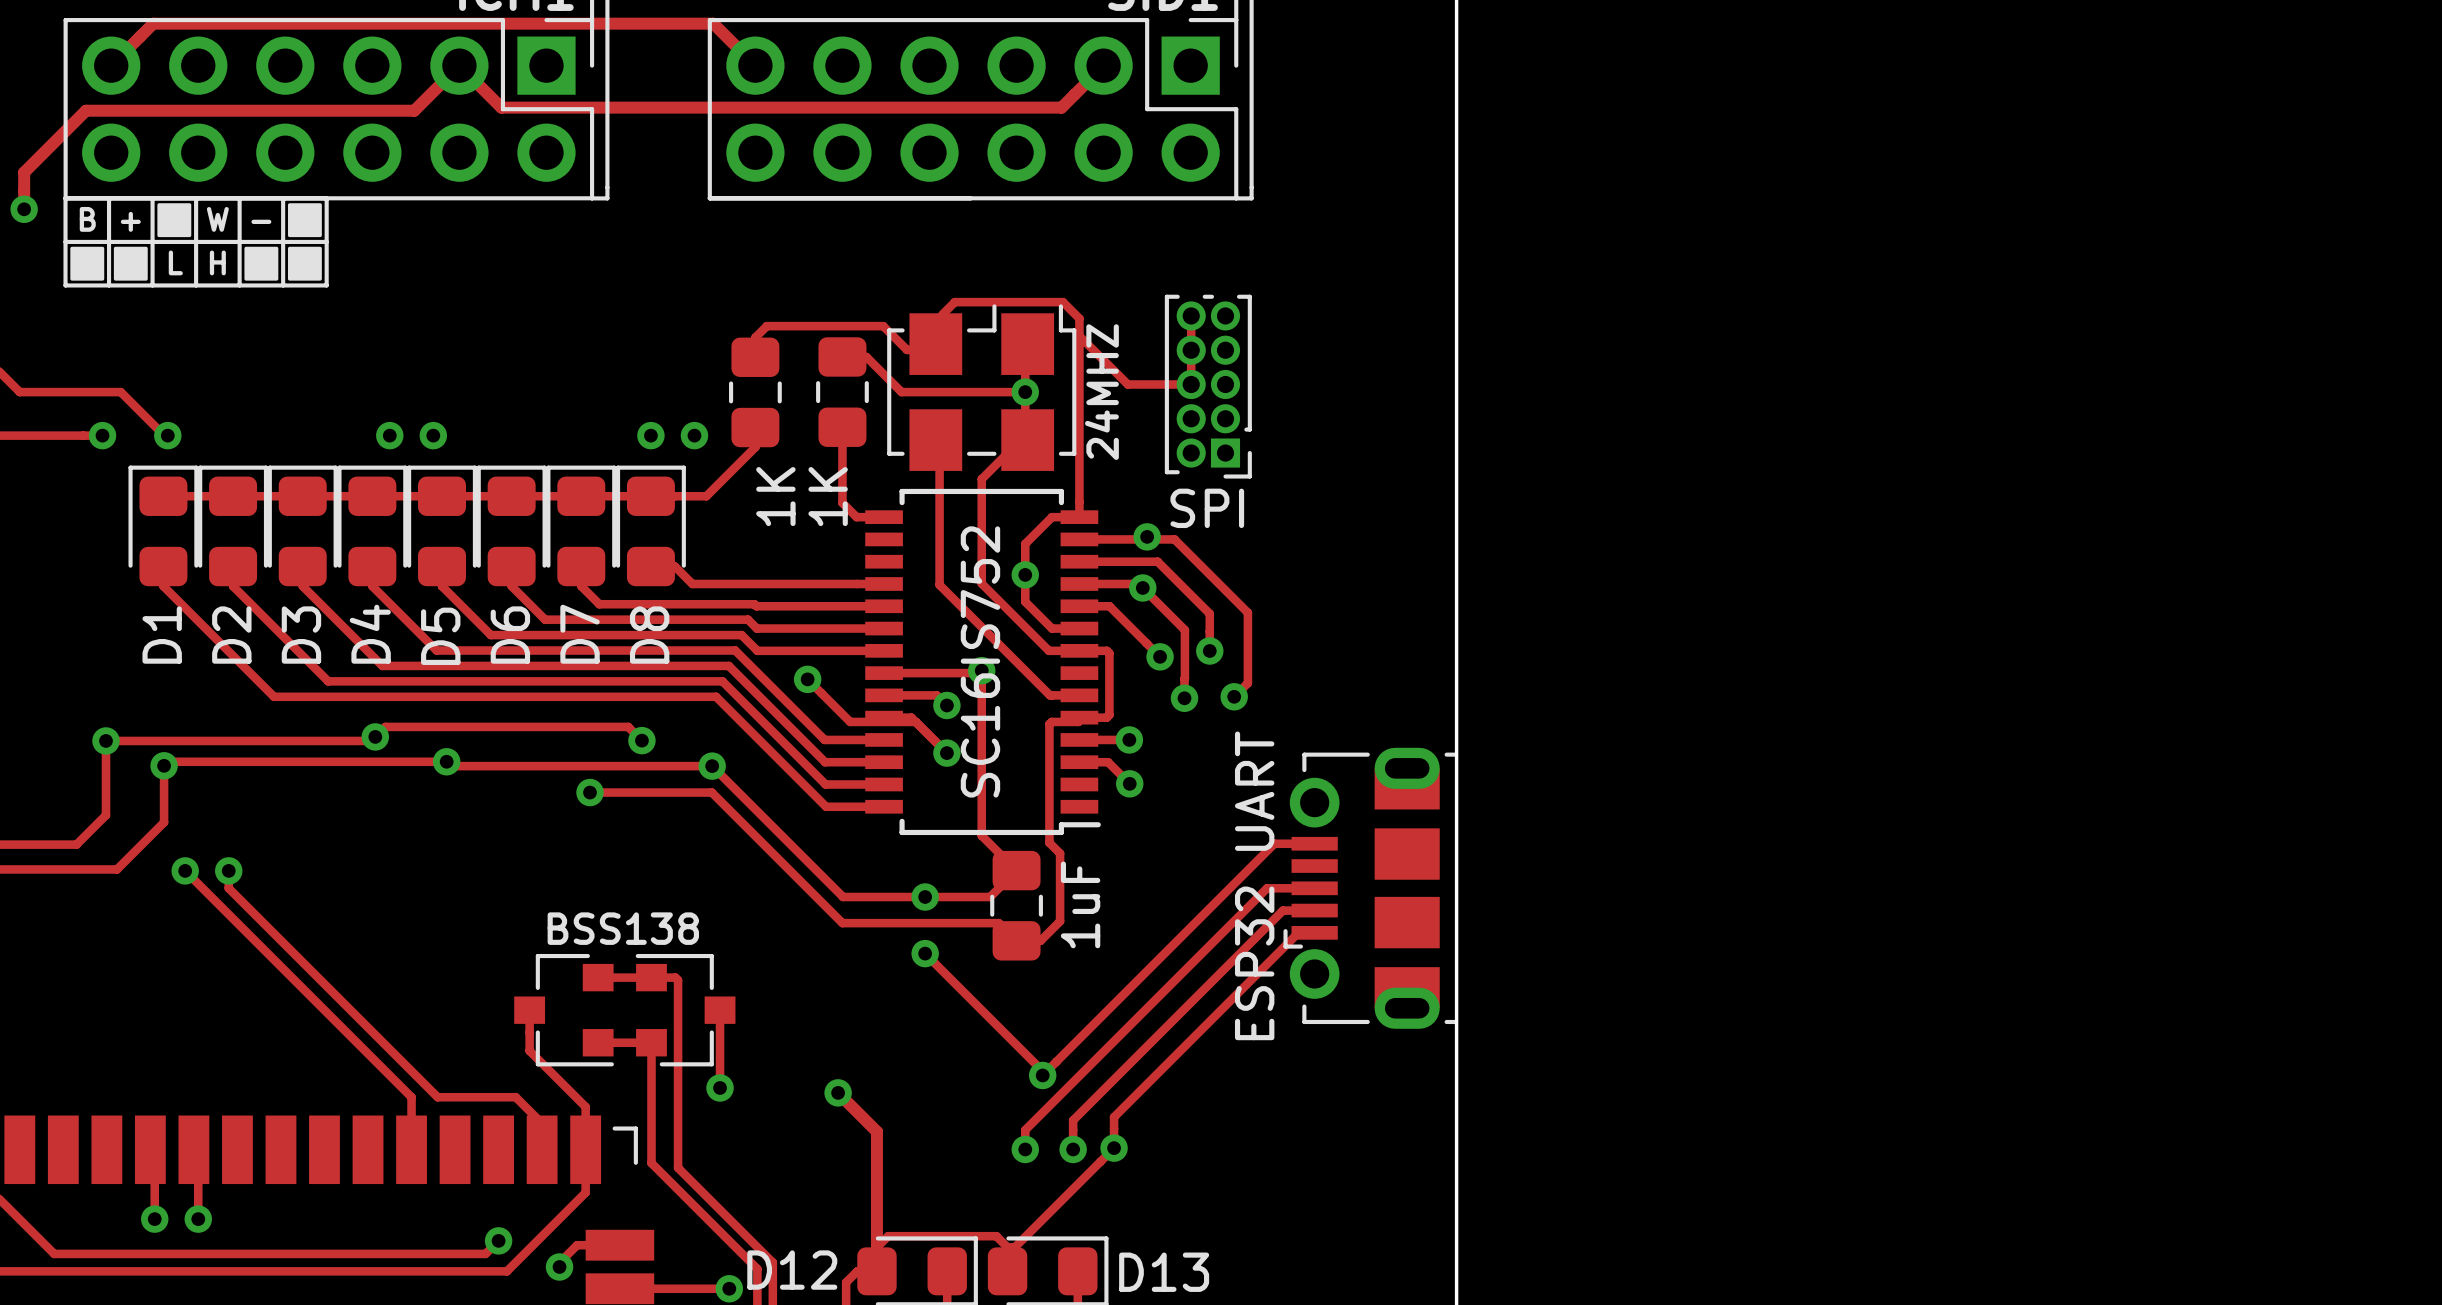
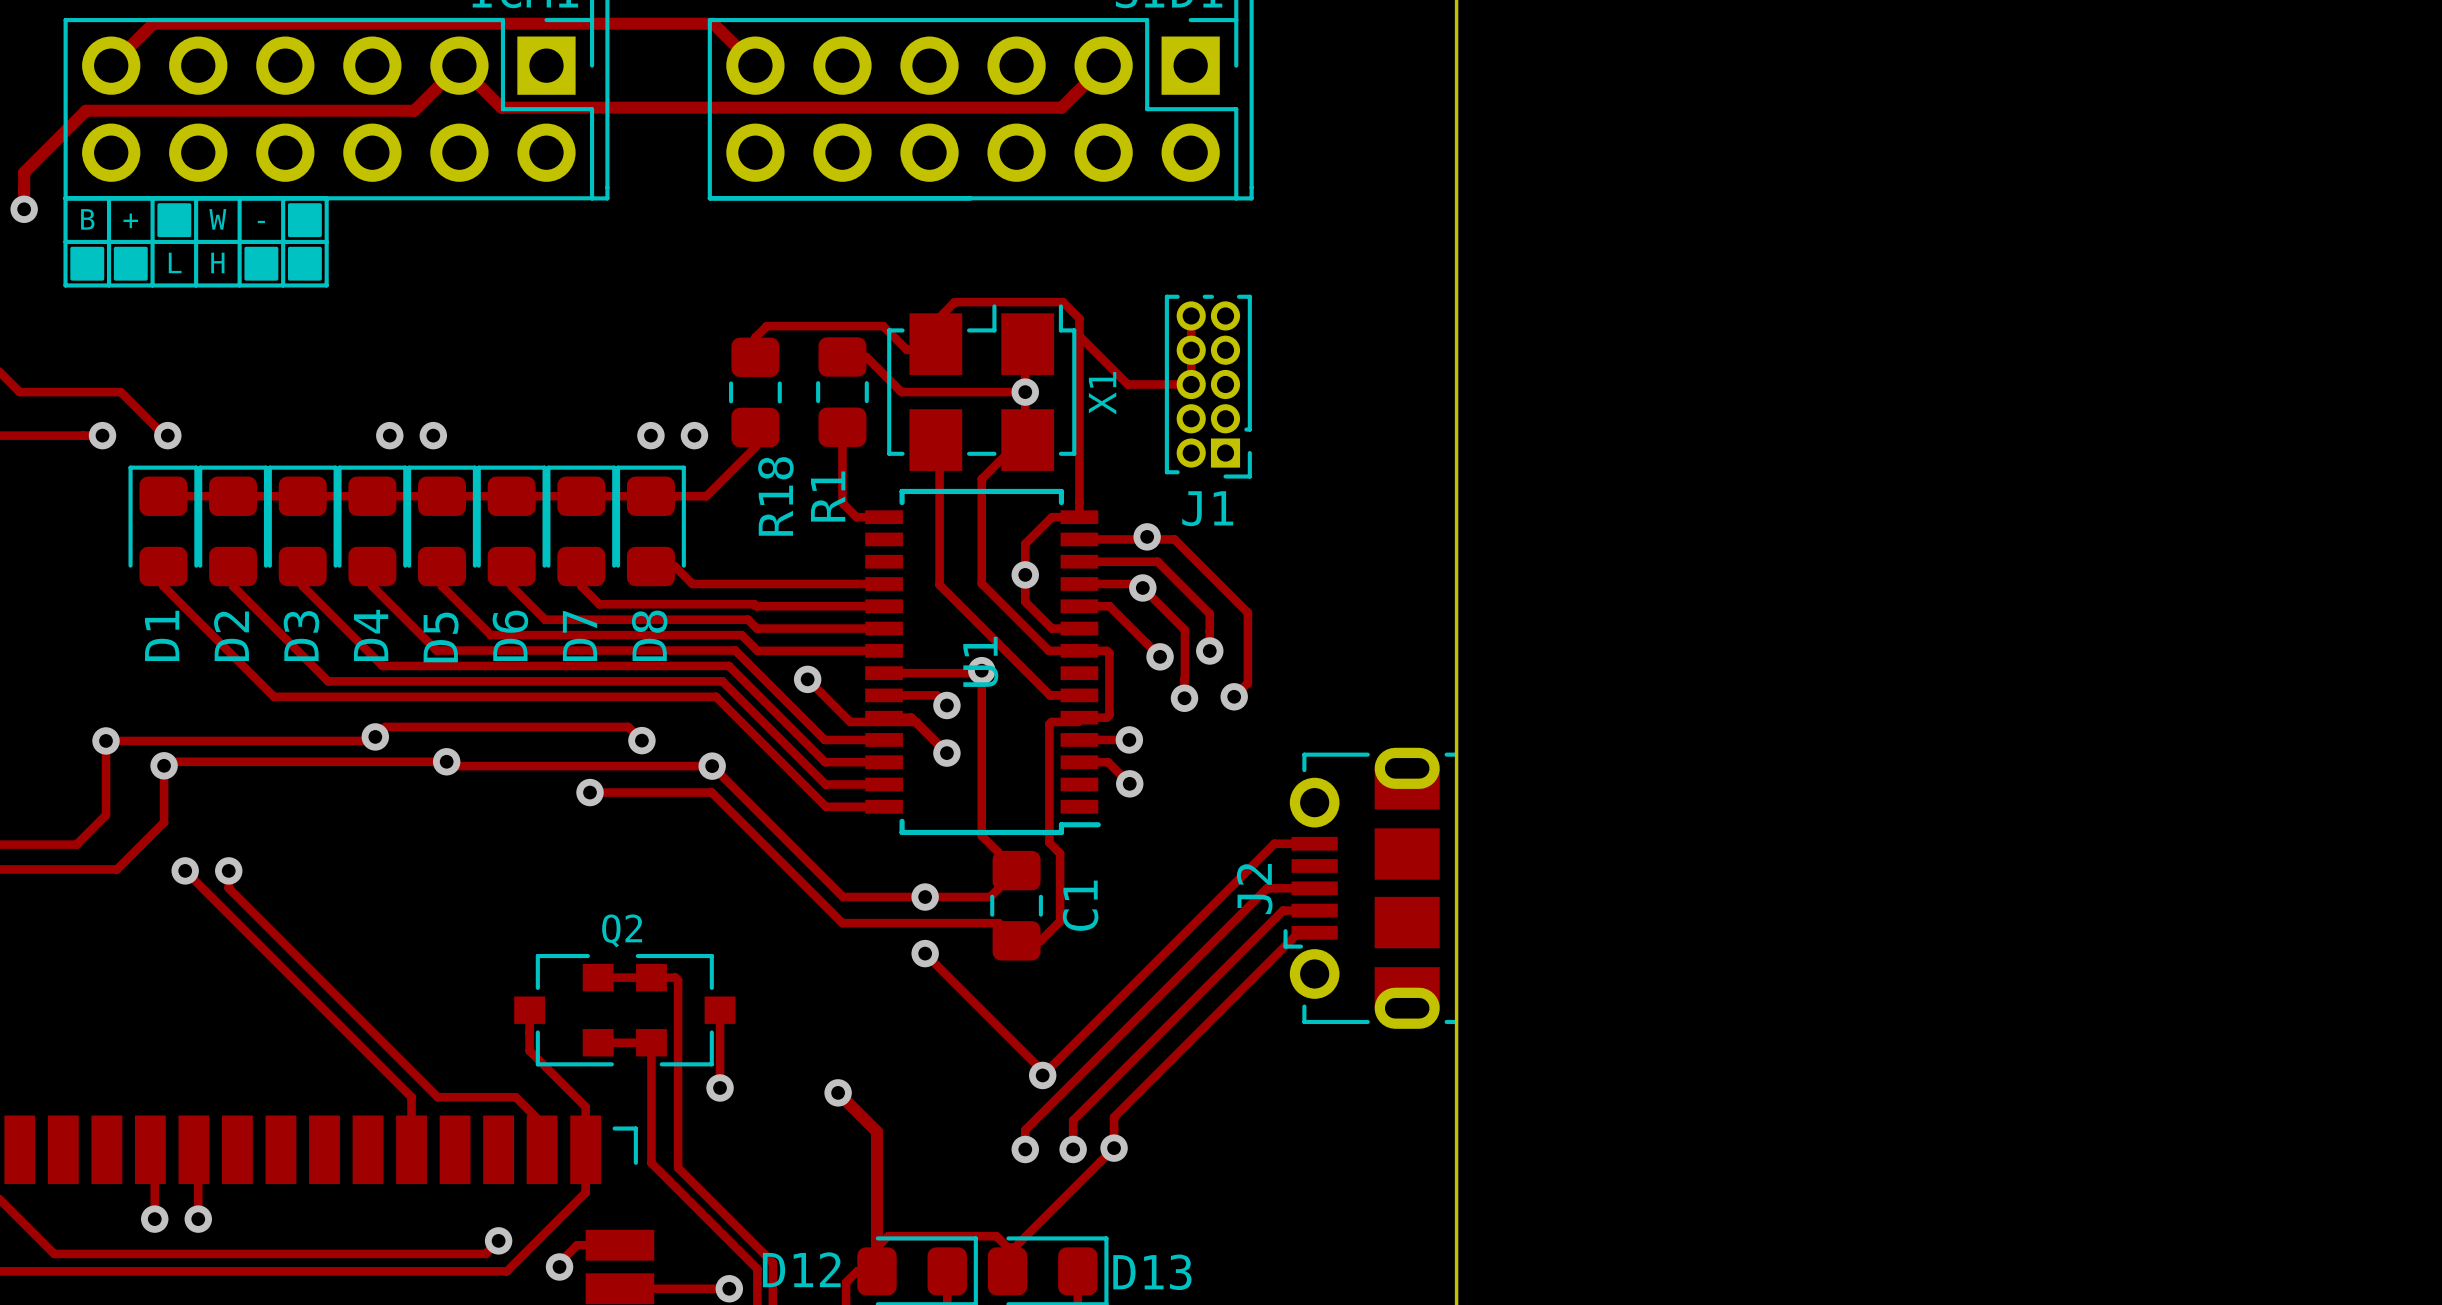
24MHZ name: 24MHZ (1101, 392) -> X1 (1102, 393)
1K name: 1K (775, 496) -> R18 (775, 496)
1K name: 1K (828, 496) -> R1 (828, 496)
SPI name: SPI (1207, 508) -> J1 (1207, 508)
SC16IS752 name: SC16IS752 (980, 661) -> U1 (980, 661)
ESP32 UART name: ESP32 UART (1254, 885) -> J2 (1254, 889)
1uF name: 1uF (1080, 904) -> C1 (1080, 905)
BSS138 name: BSS138 (623, 928) -> Q2 (622, 930)

